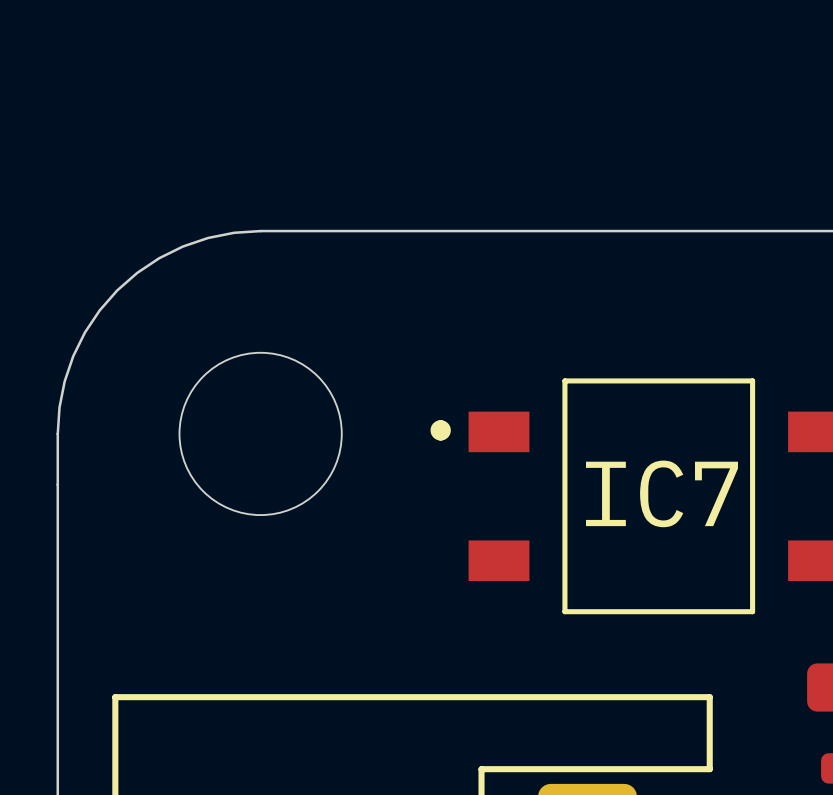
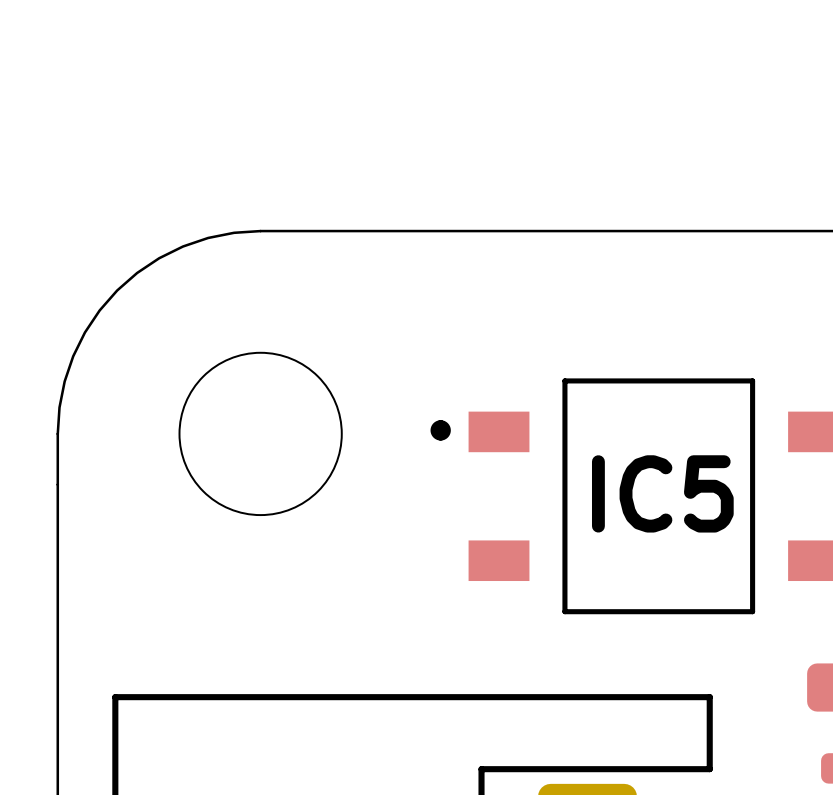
IC7 name: IC7 (661, 493) -> IC5 (662, 493)

